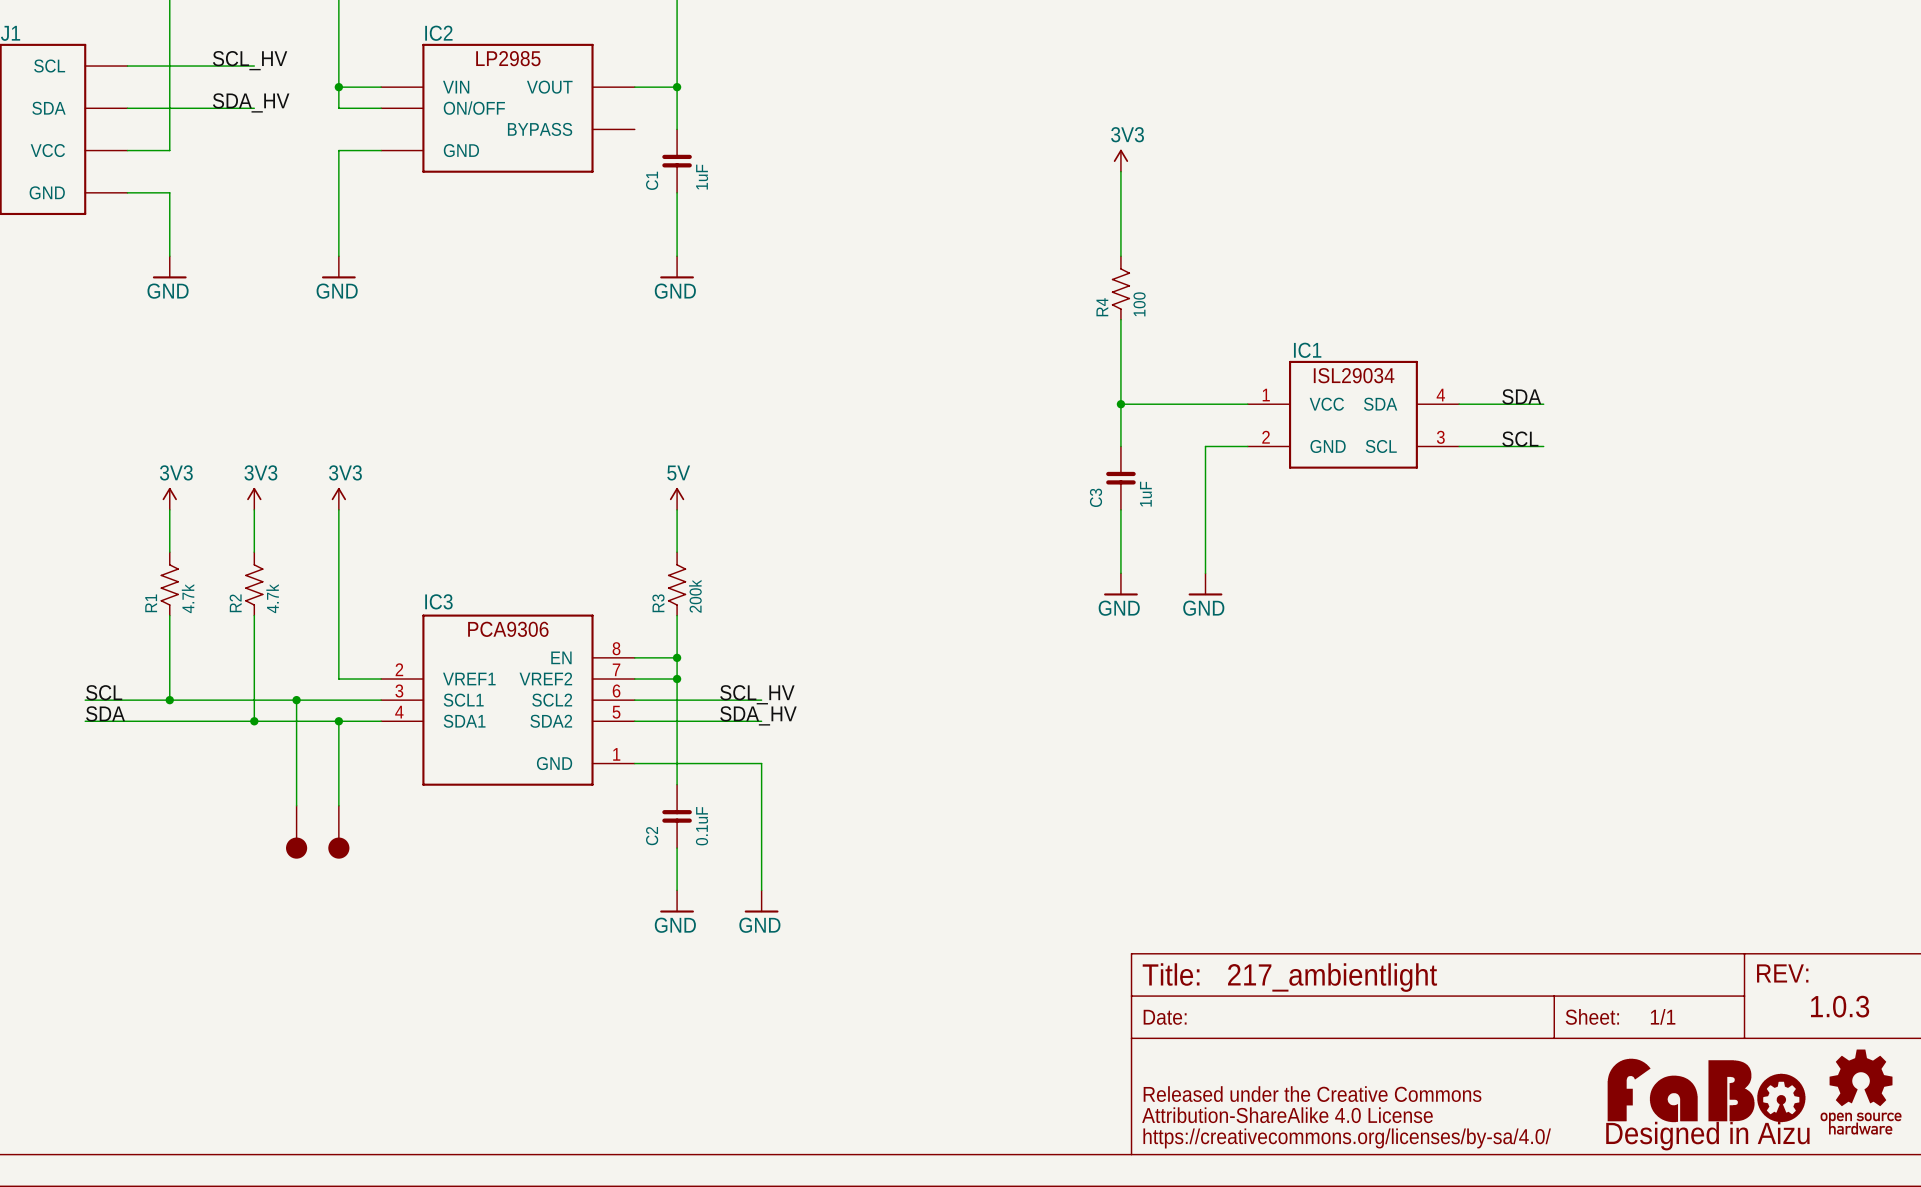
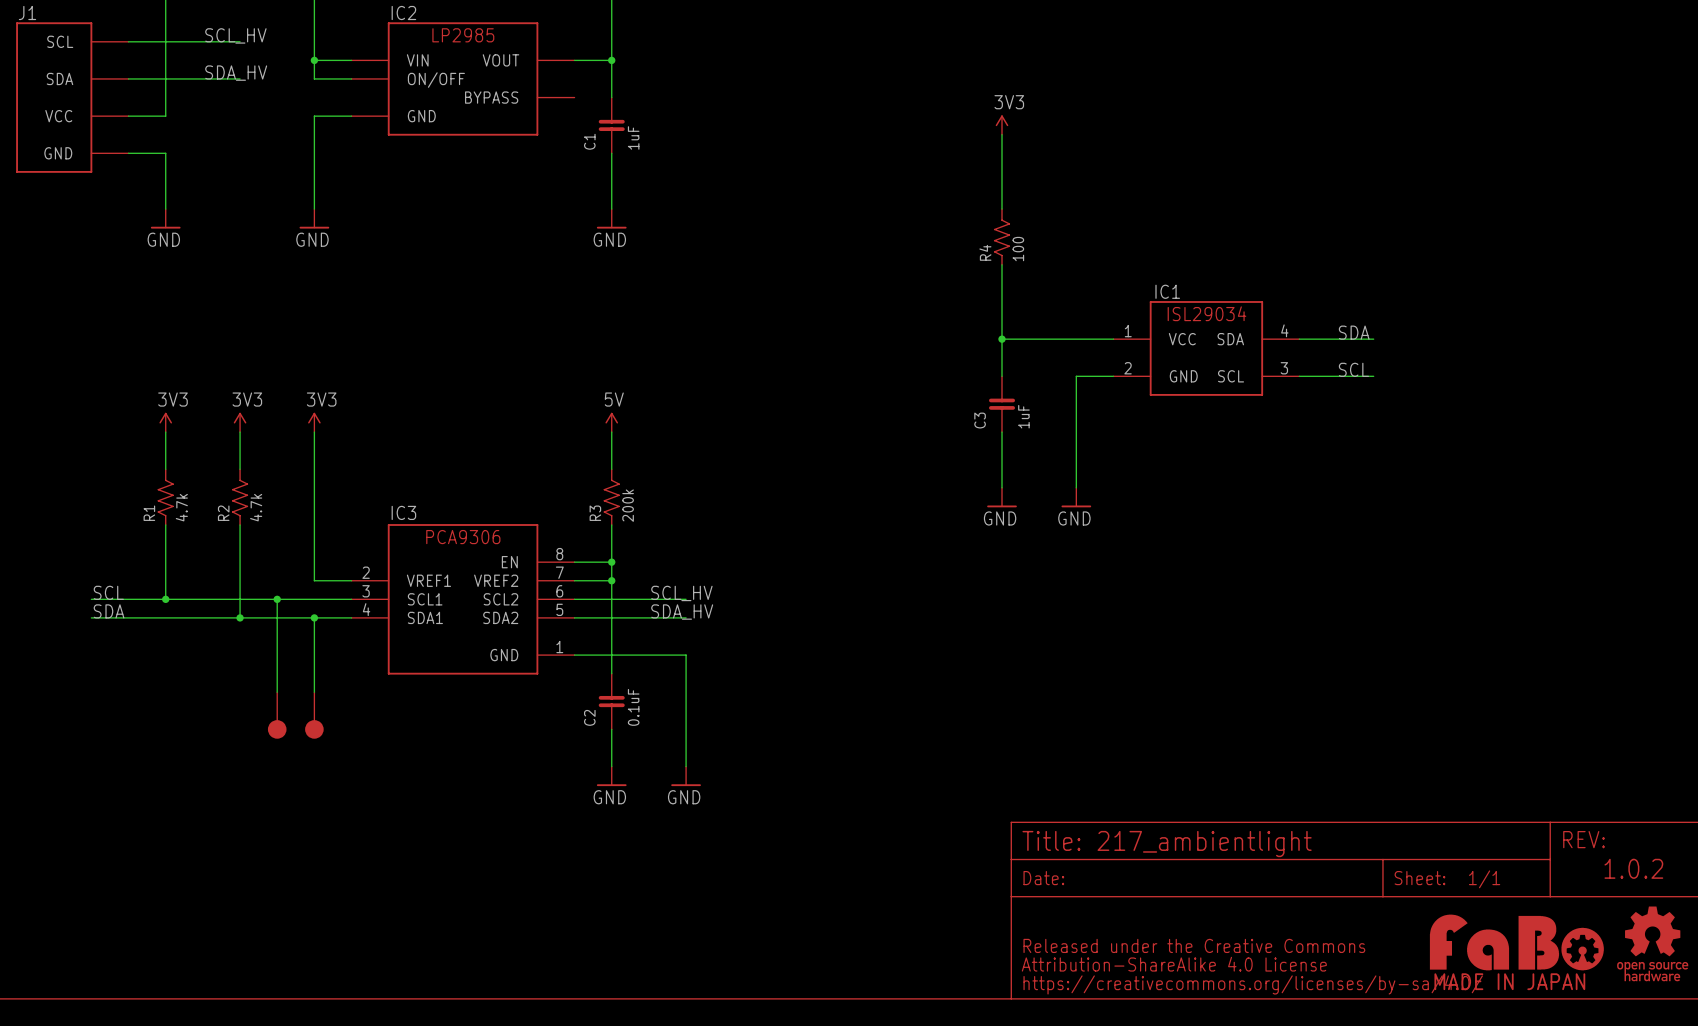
text: 1.0.3 (1840, 1006) -> 1.0.2 (1633, 868)
part text: none -> MADE IN JAPAN (1509, 981)
part text: Designed in Aizu (1707, 1136) -> none

